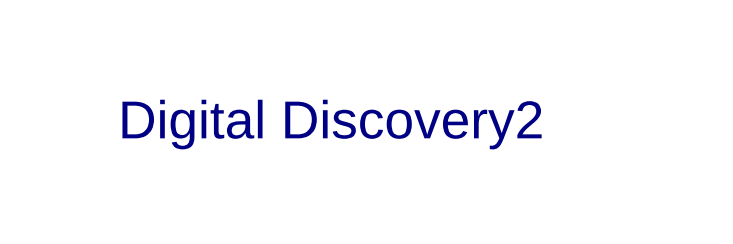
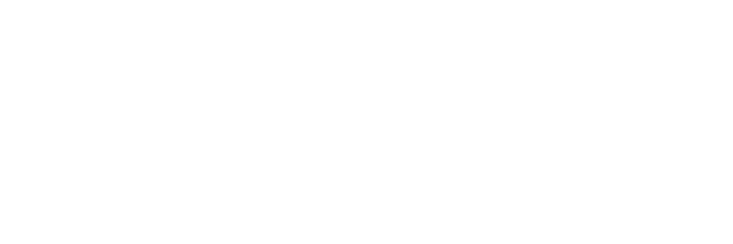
text: Digital Discovery2 (332, 124) -> none

